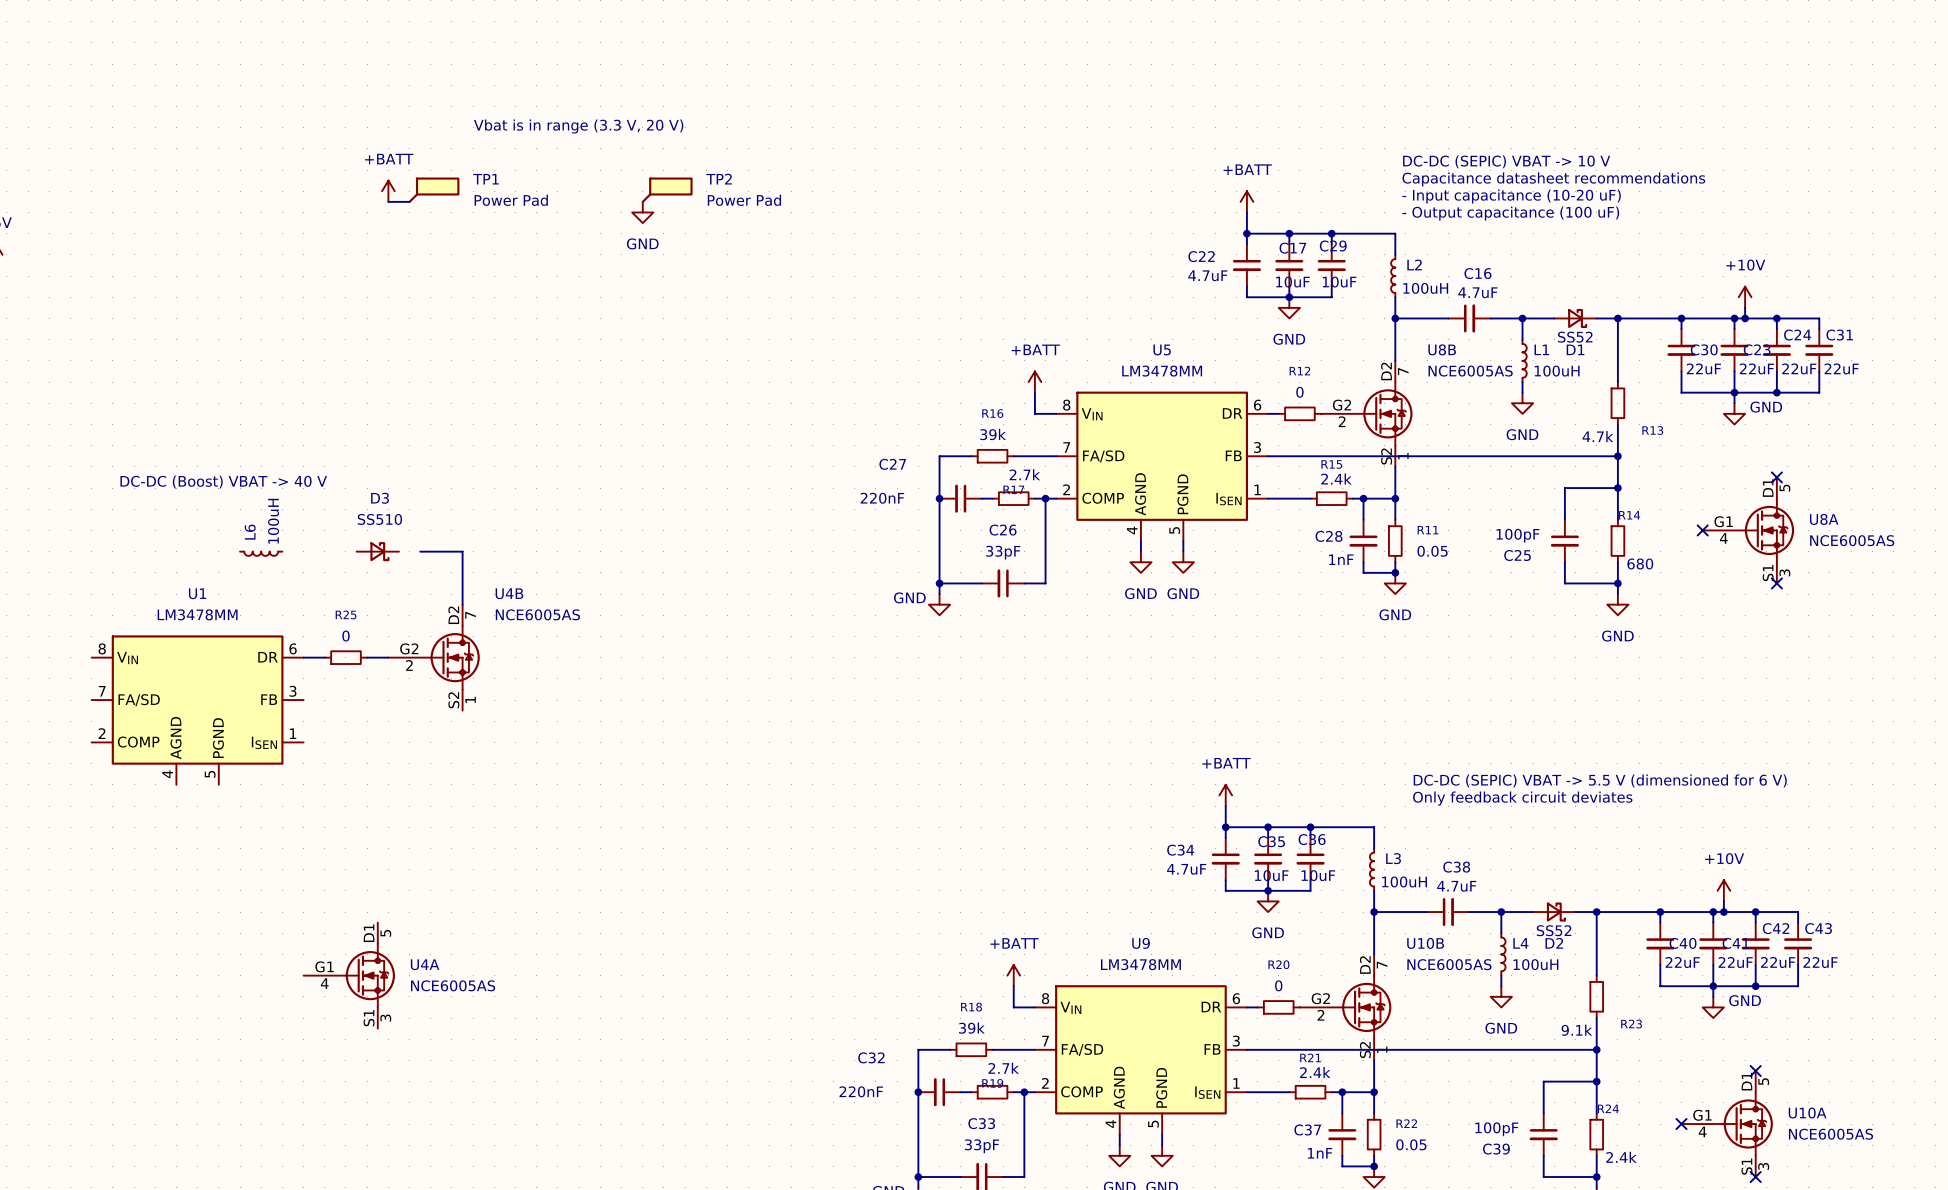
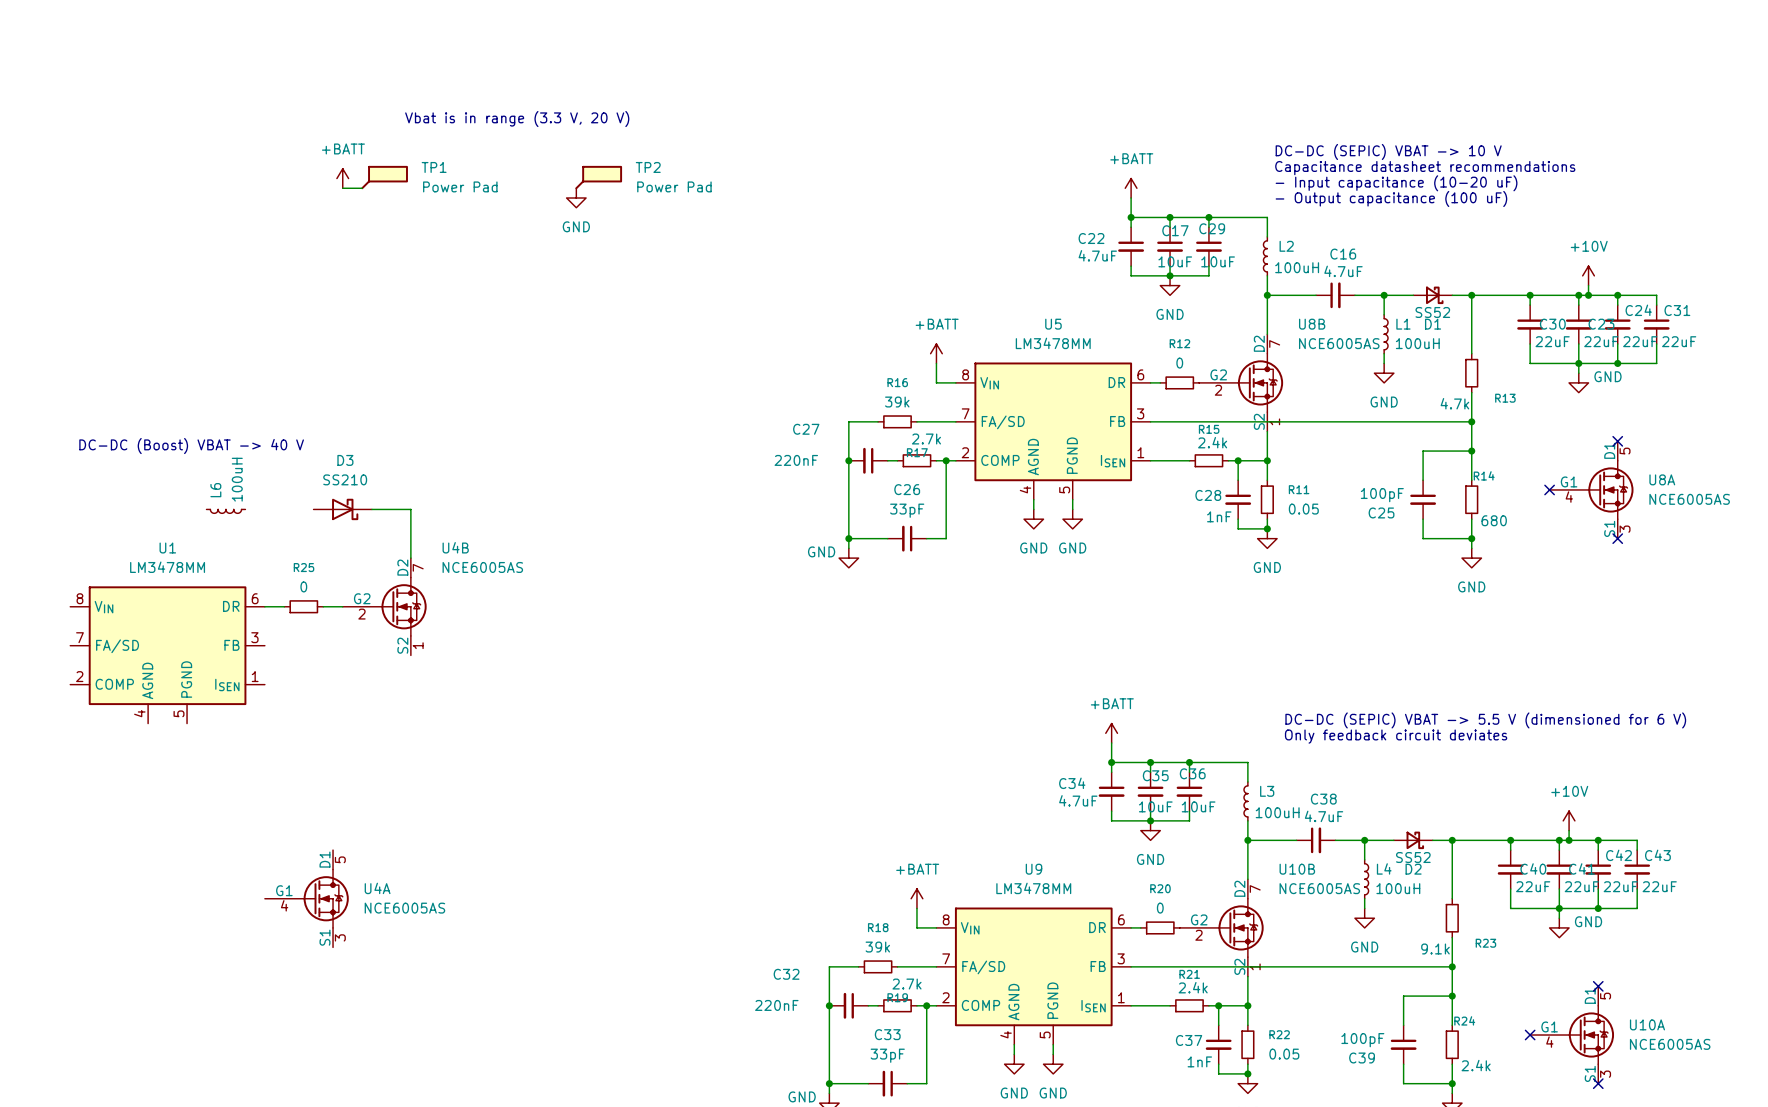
D3 value: SS510 (379, 519) -> SS210 (345, 479)
D3 symbol: [356, 542, 399, 562] -> [313, 498, 372, 521]

